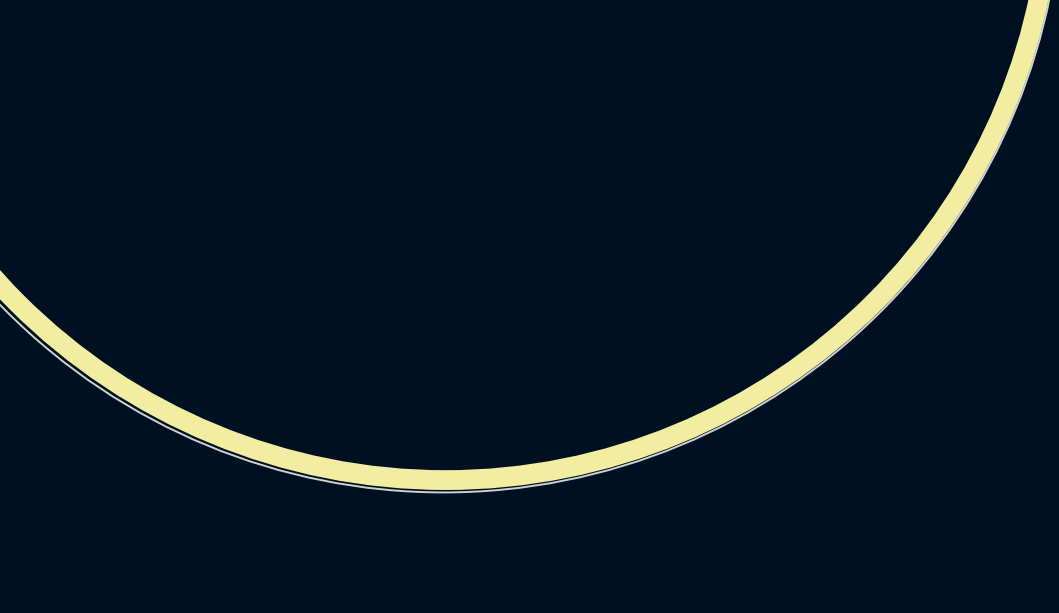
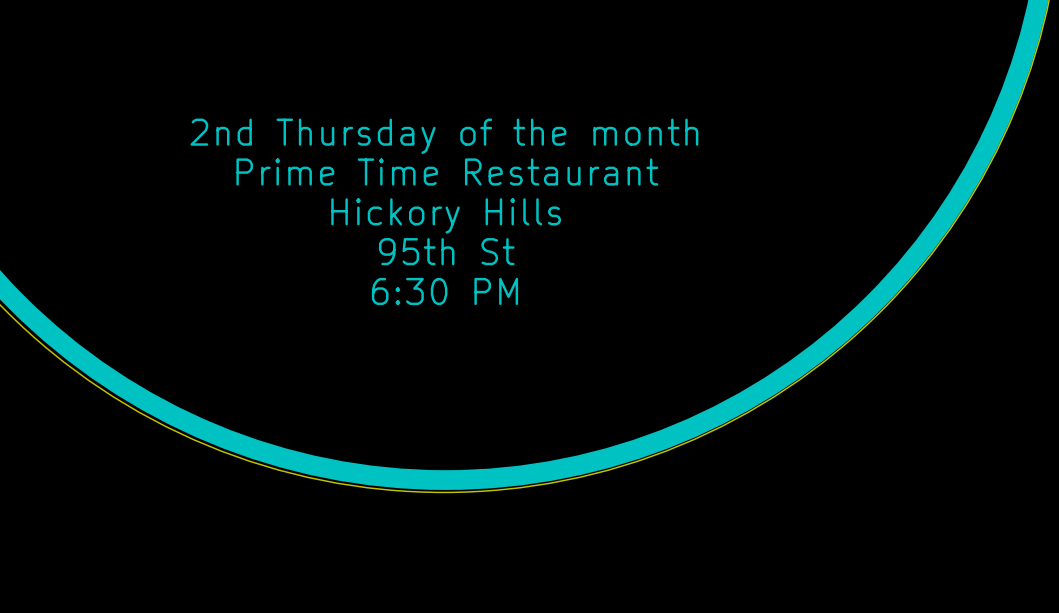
text: none -> 2nd Thursday of the month (444, 136)
text: none -> Prime Time Restaurant (447, 171)
text: none -> Hickory Hills (446, 215)
text: none -> 95th St (446, 251)
text: none -> 6:30 PM (444, 291)

